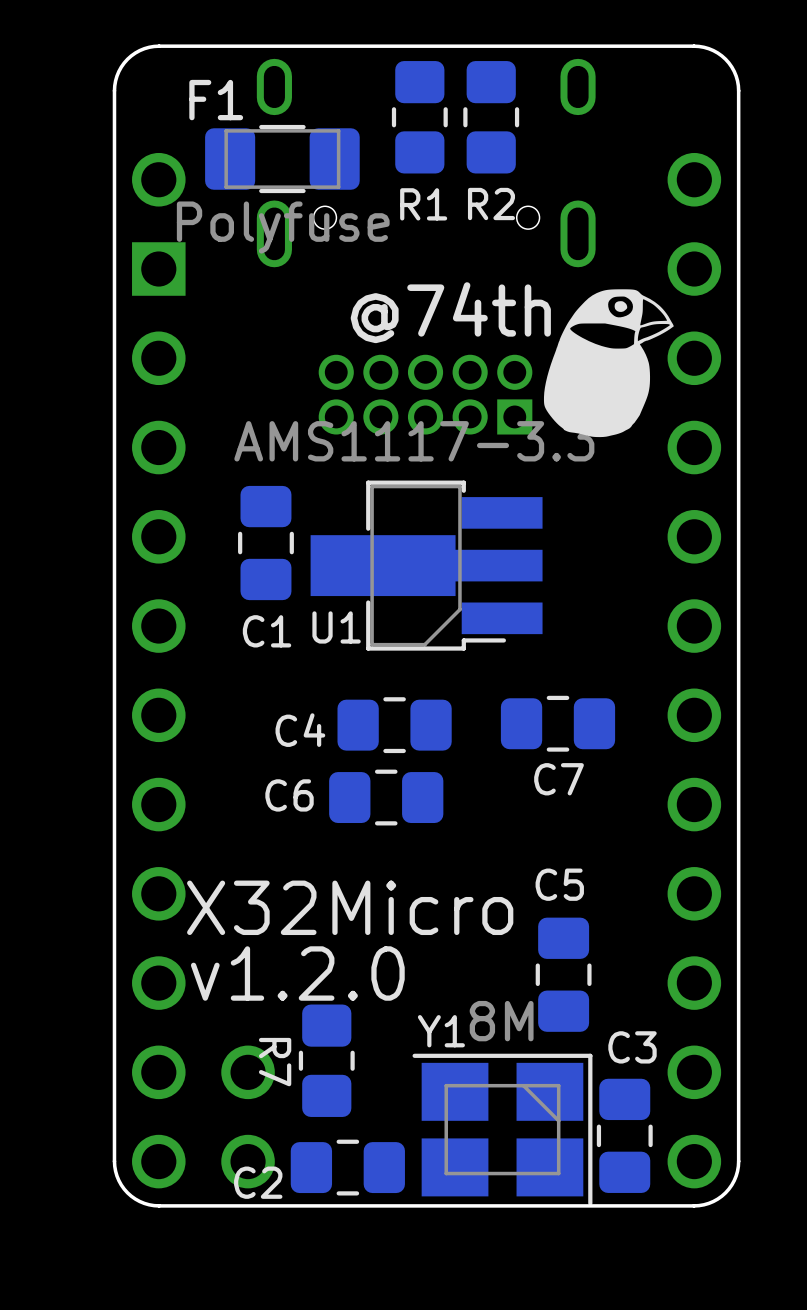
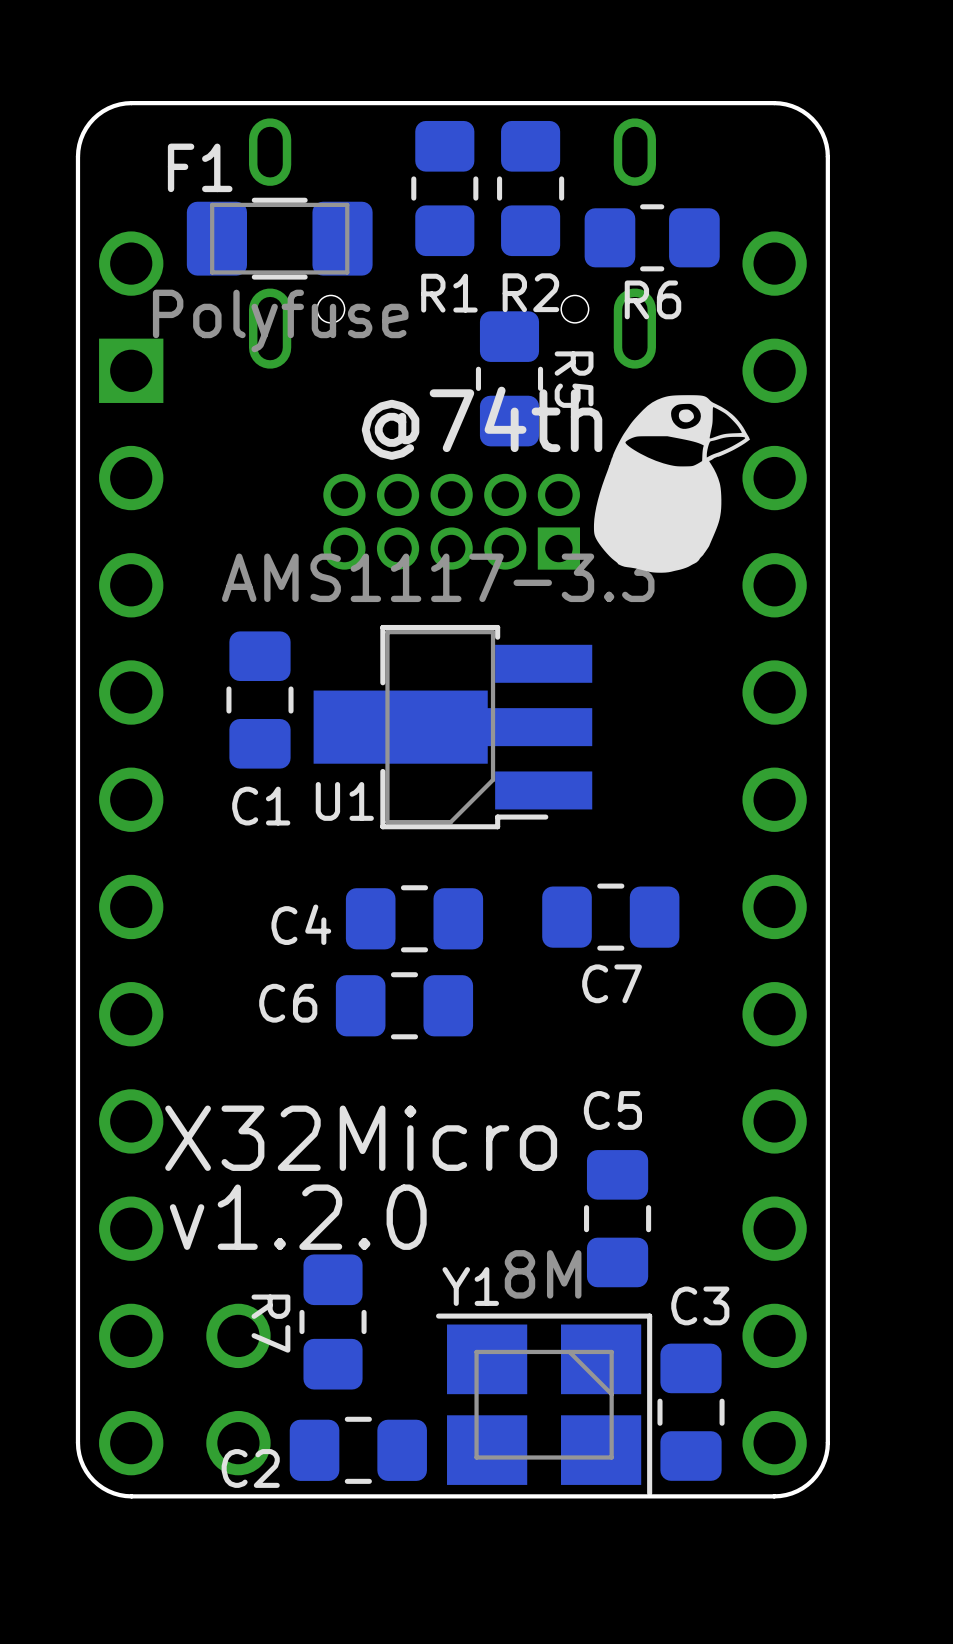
R6: none -> (652, 237)
R5: none -> (509, 378)

